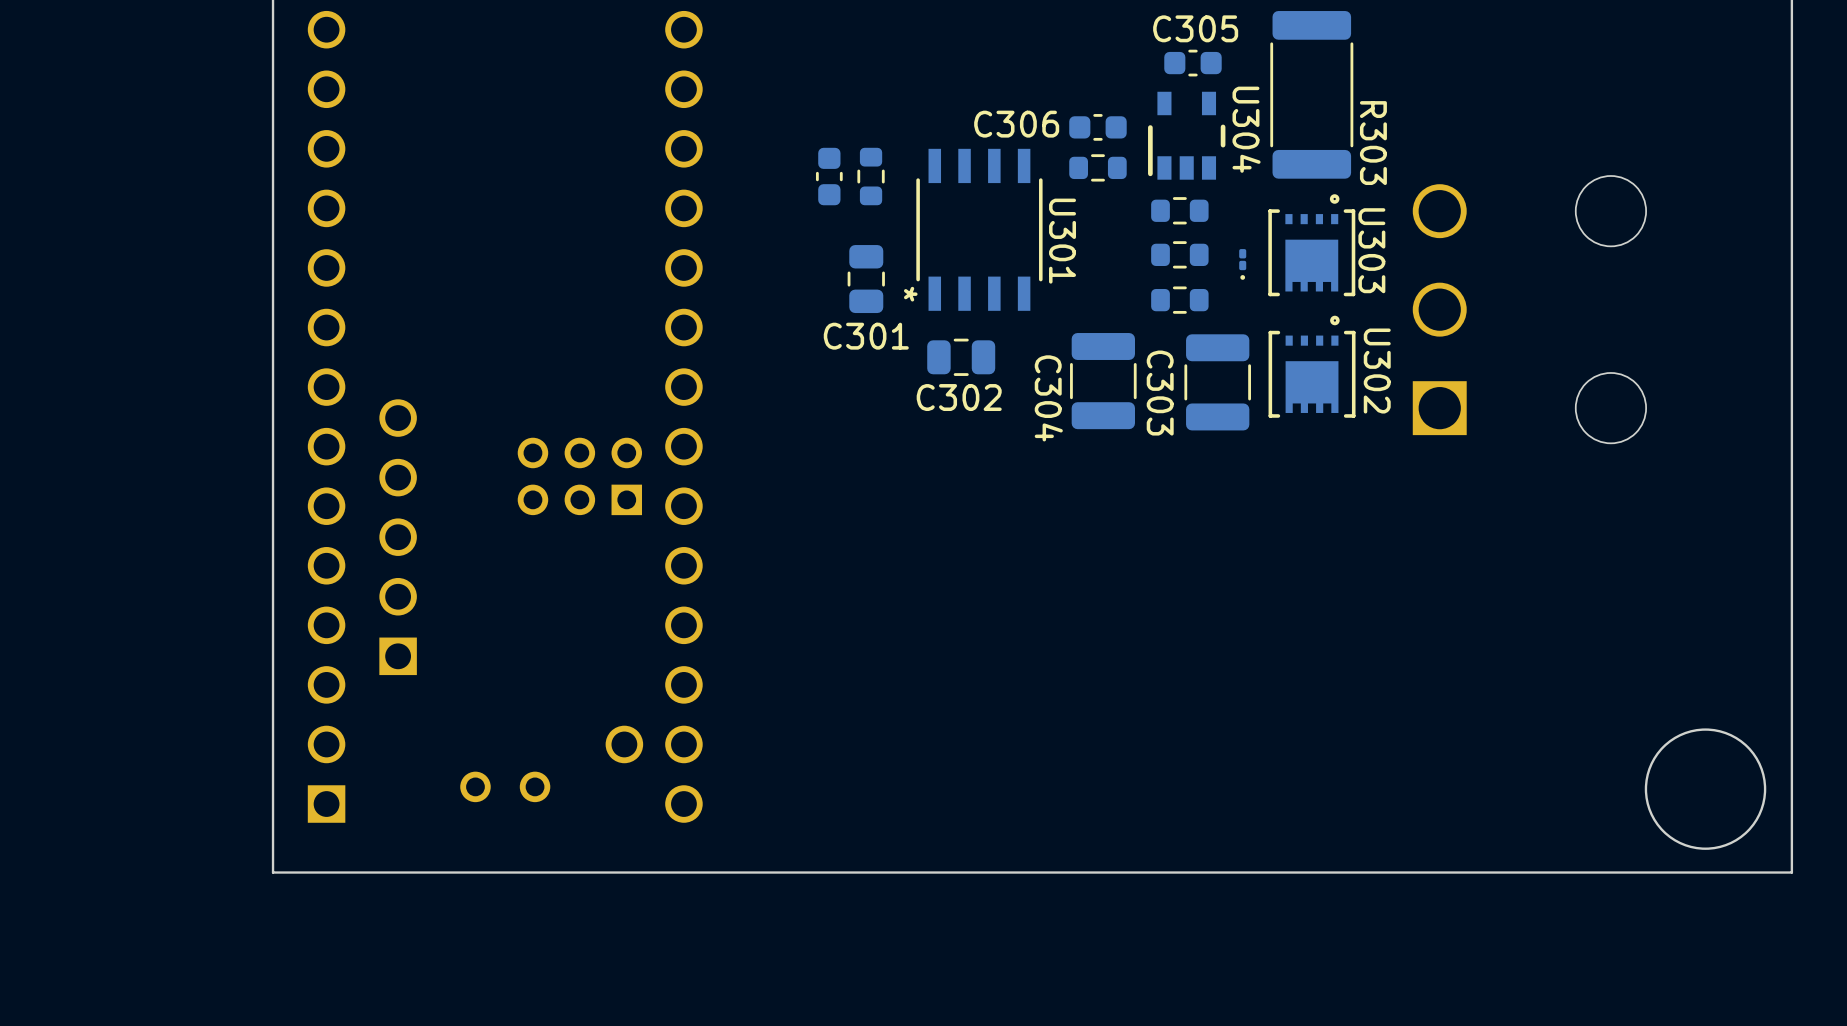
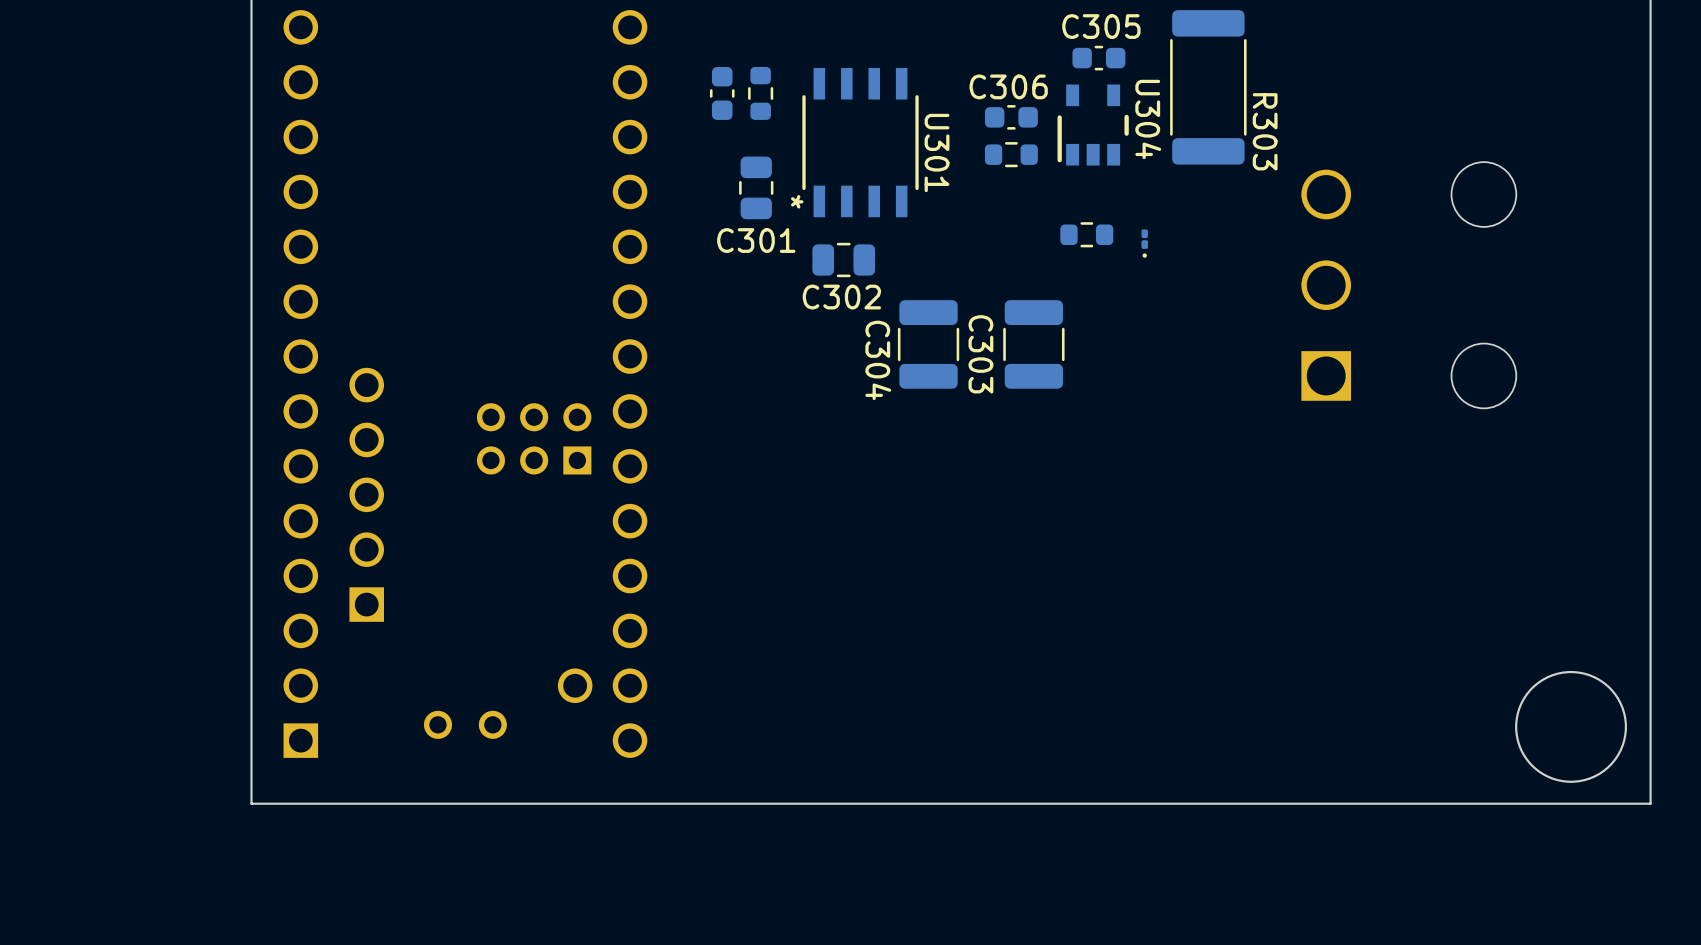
C306 name position: C306 (1016, 124) -> C306 (1008, 86)
part position: (829, 176) -> (722, 93)
part position: (871, 176) -> (760, 93)
part: (1179, 210) -> none
U301 position: (979, 229) -> (860, 142)
U303: (1311, 245) -> none
C301 position: (866, 279) -> (756, 187)
part: (1179, 300) -> none
C302 position: (961, 357) -> (843, 260)
U302: (1312, 366) -> none
C304 position: (1103, 381) -> (928, 344)
C303 position: (1217, 382) -> (1033, 344)

